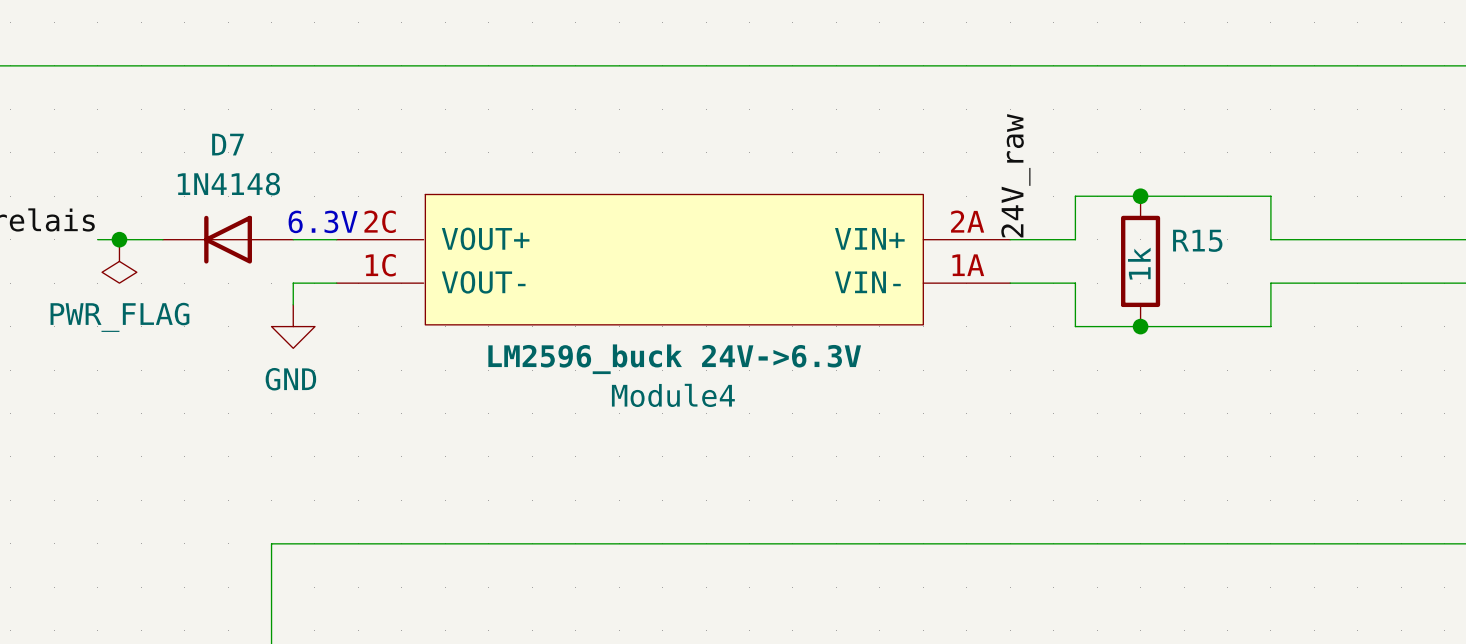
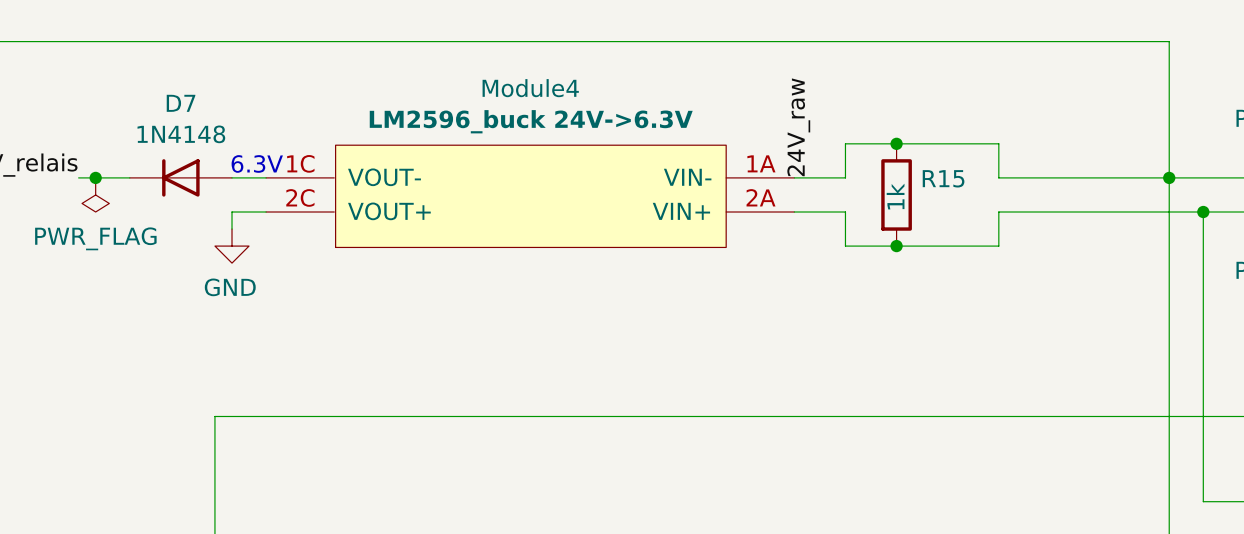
Module4 flip: as is (674, 259) -> up-down (530, 196)

